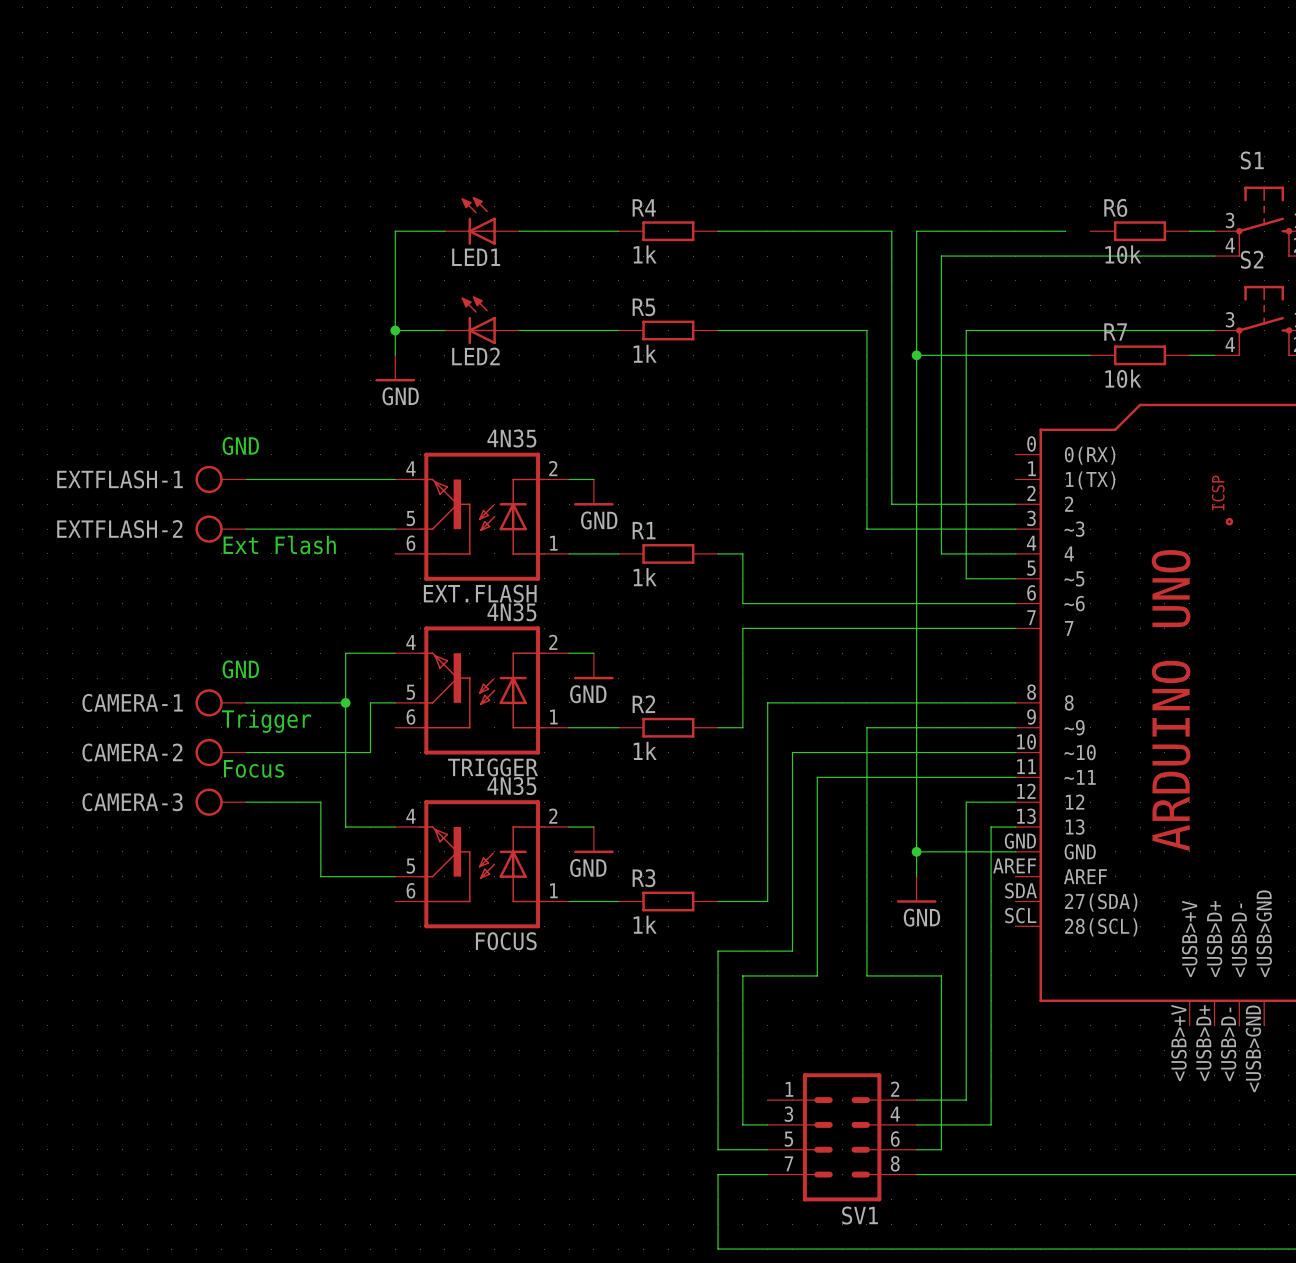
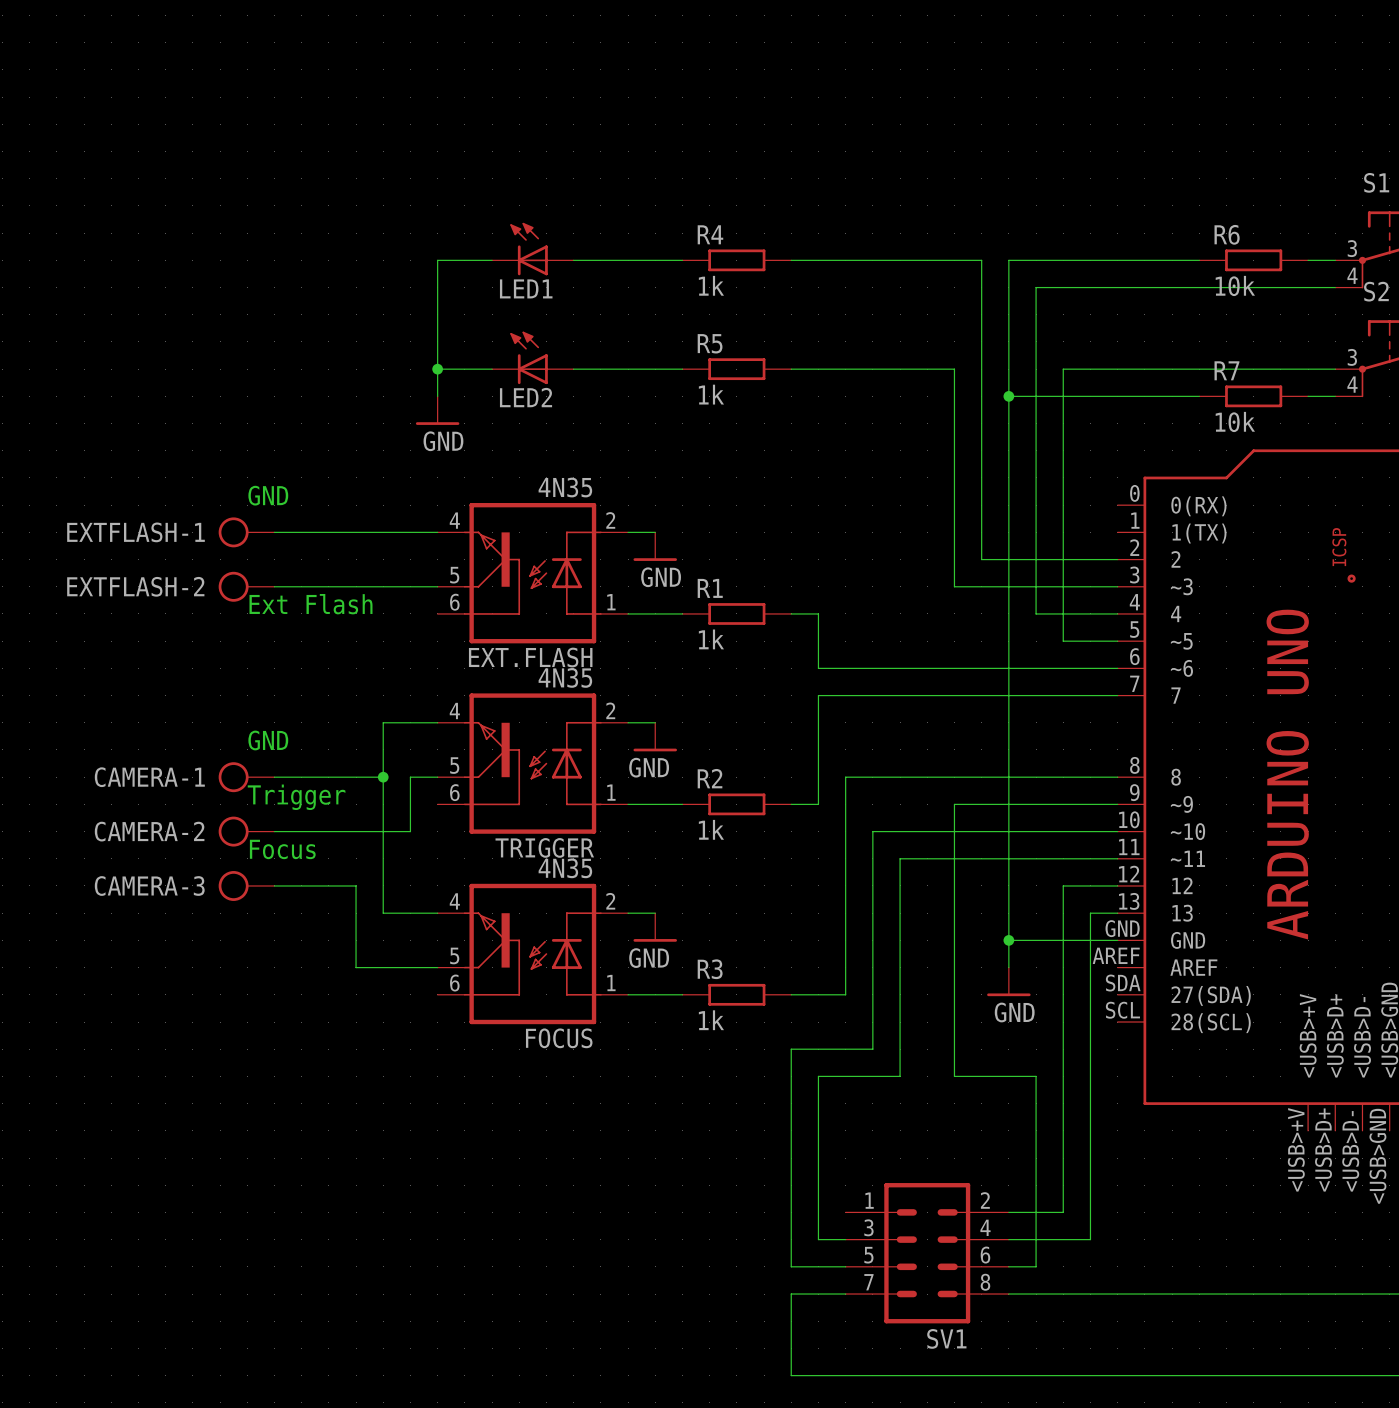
wire: none -> (1172, 260) (1199, 260)

